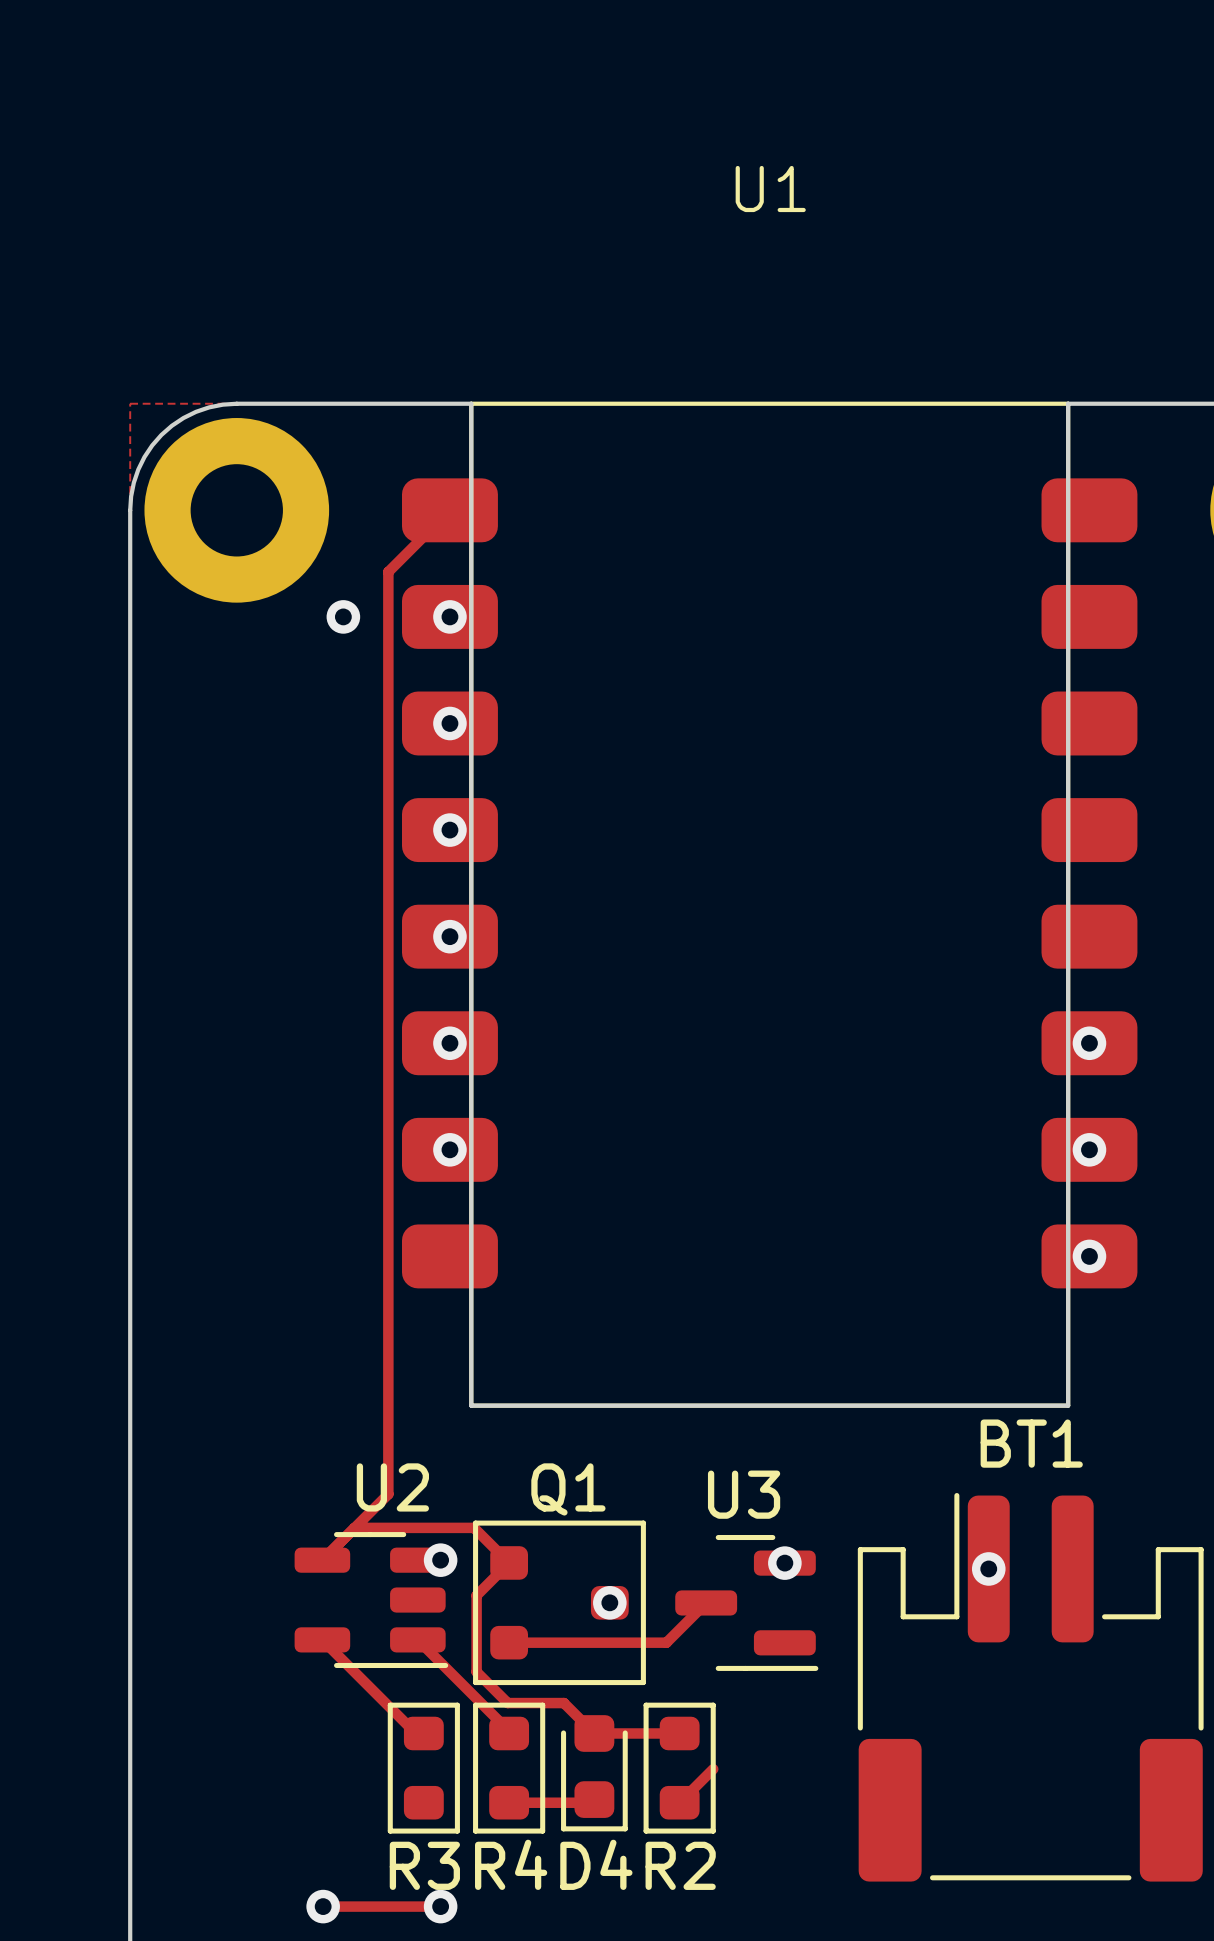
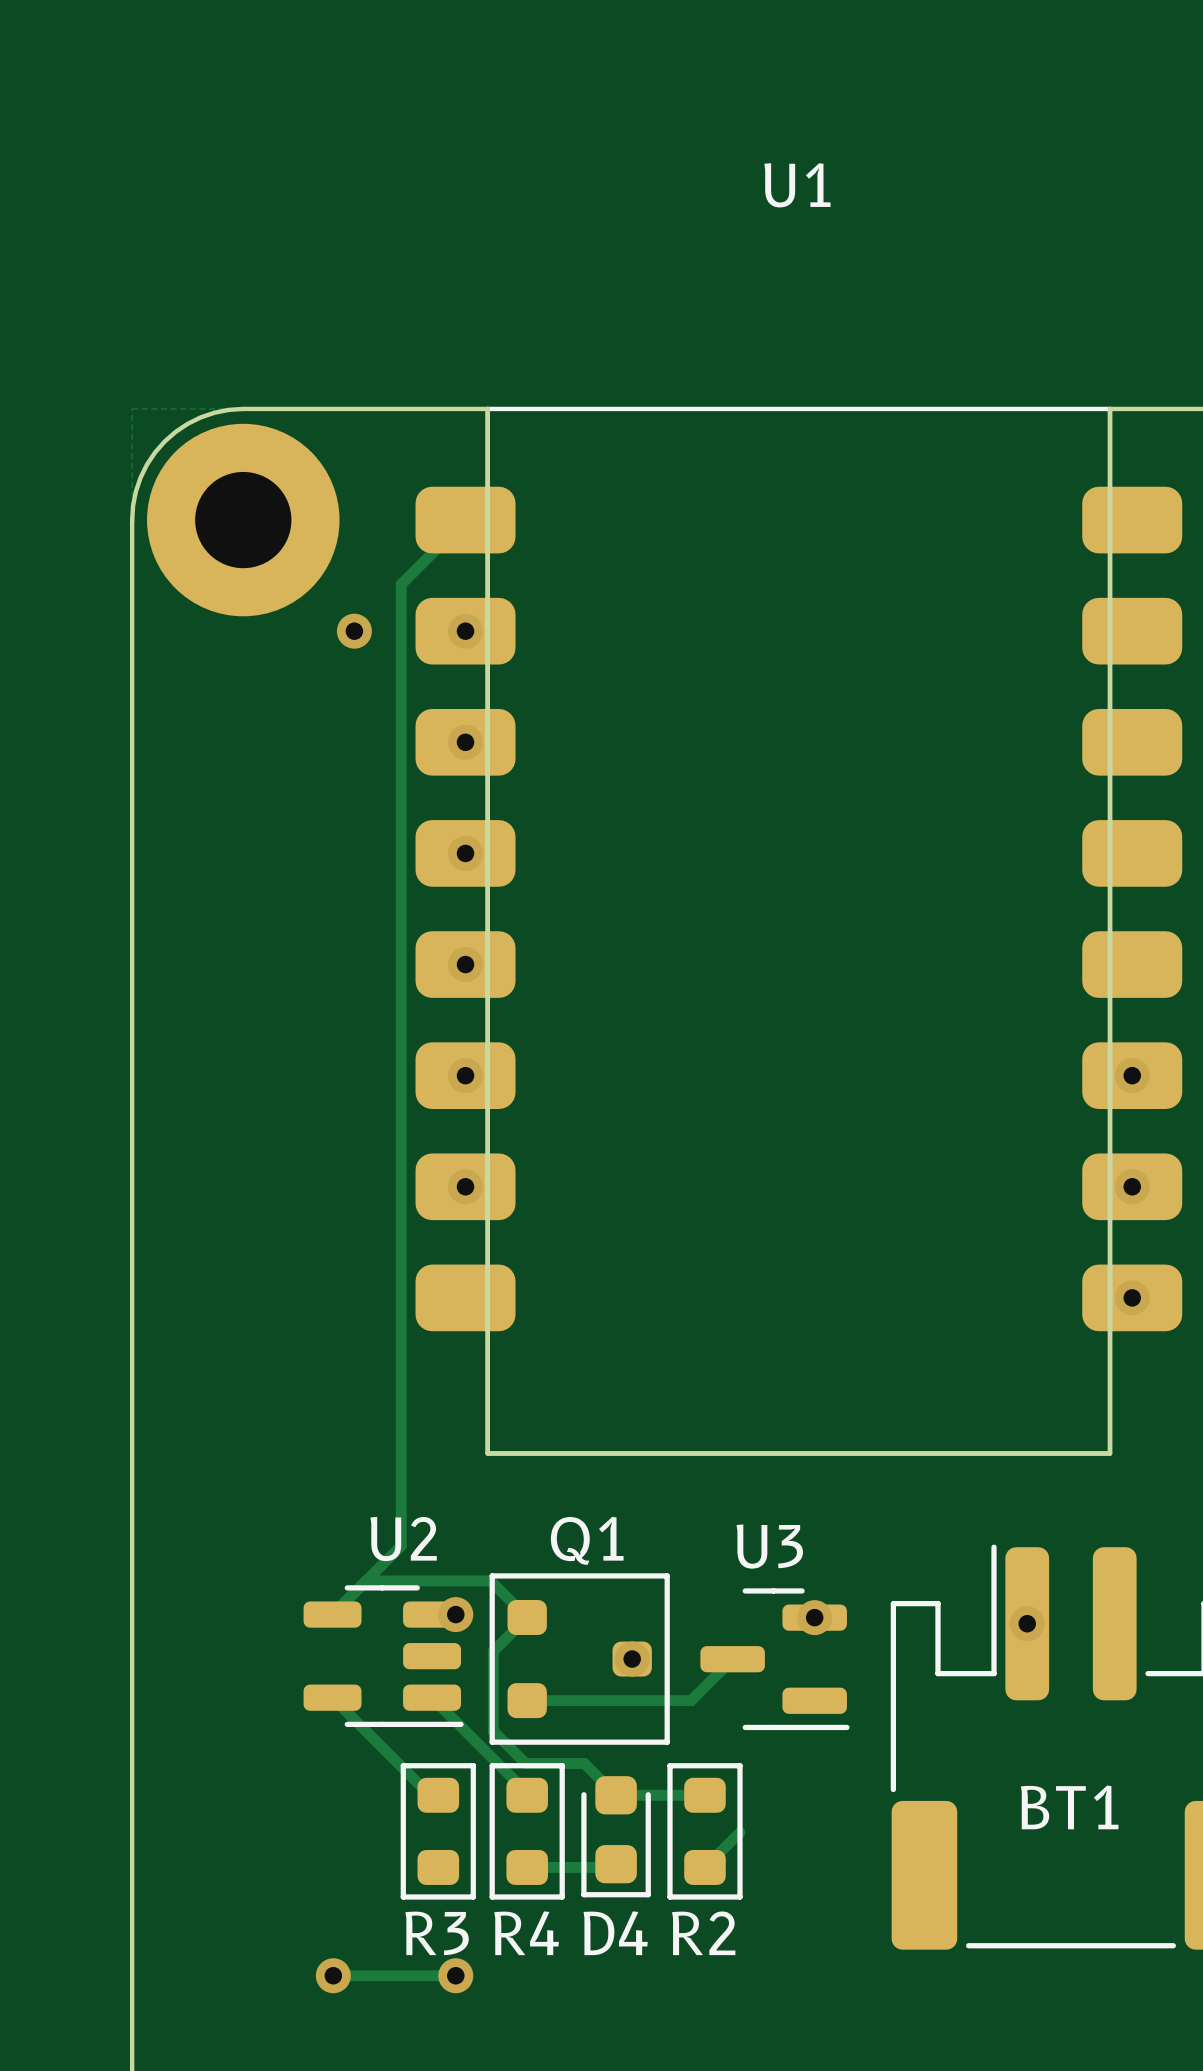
BT1 name position: BT1 (1031, 1443) -> BT1 (1069, 1807)

